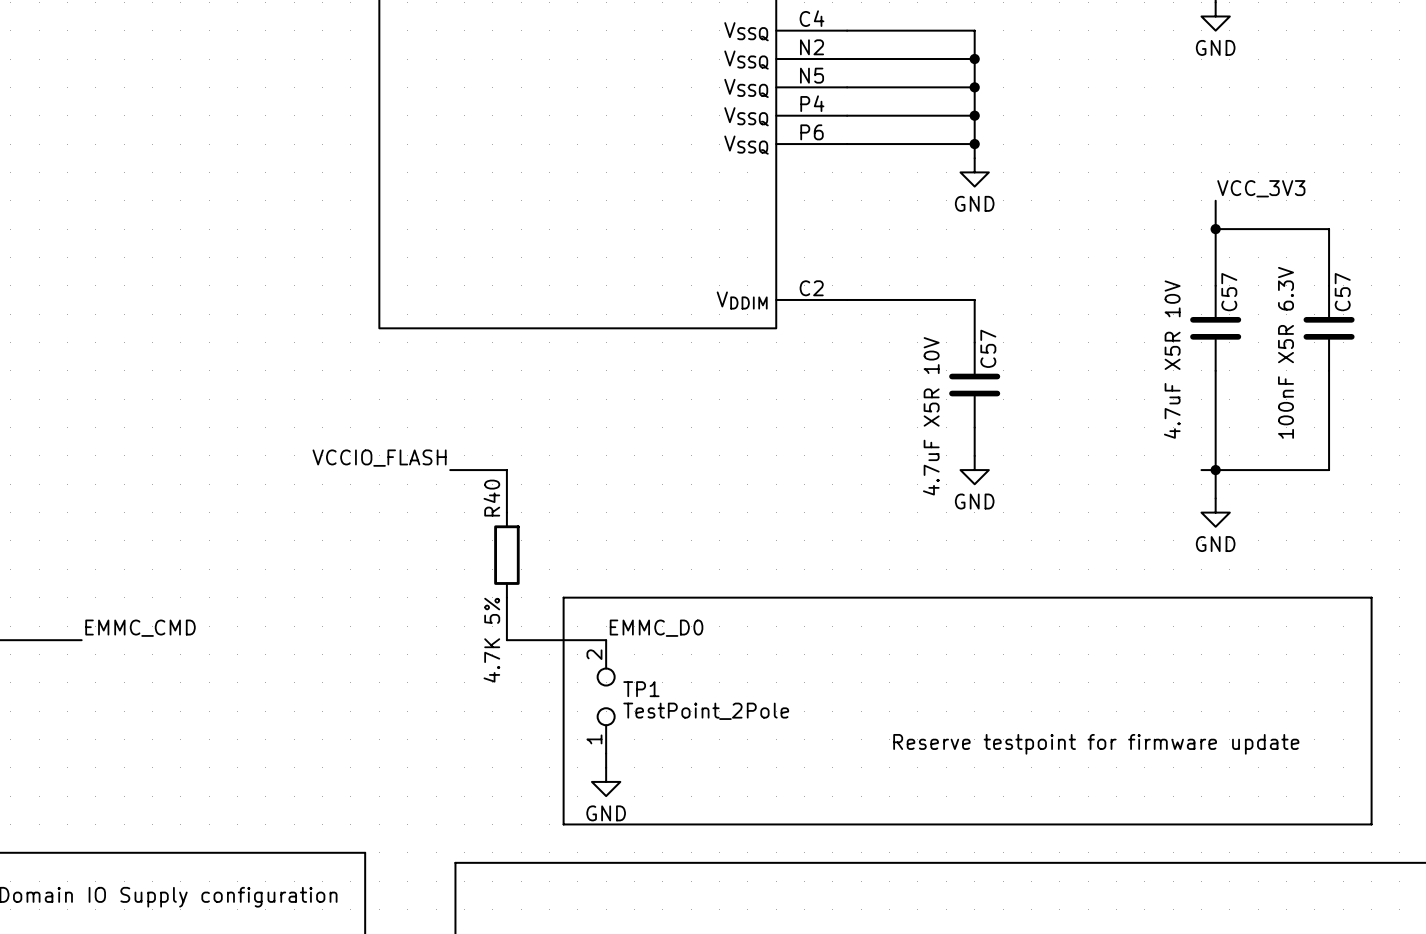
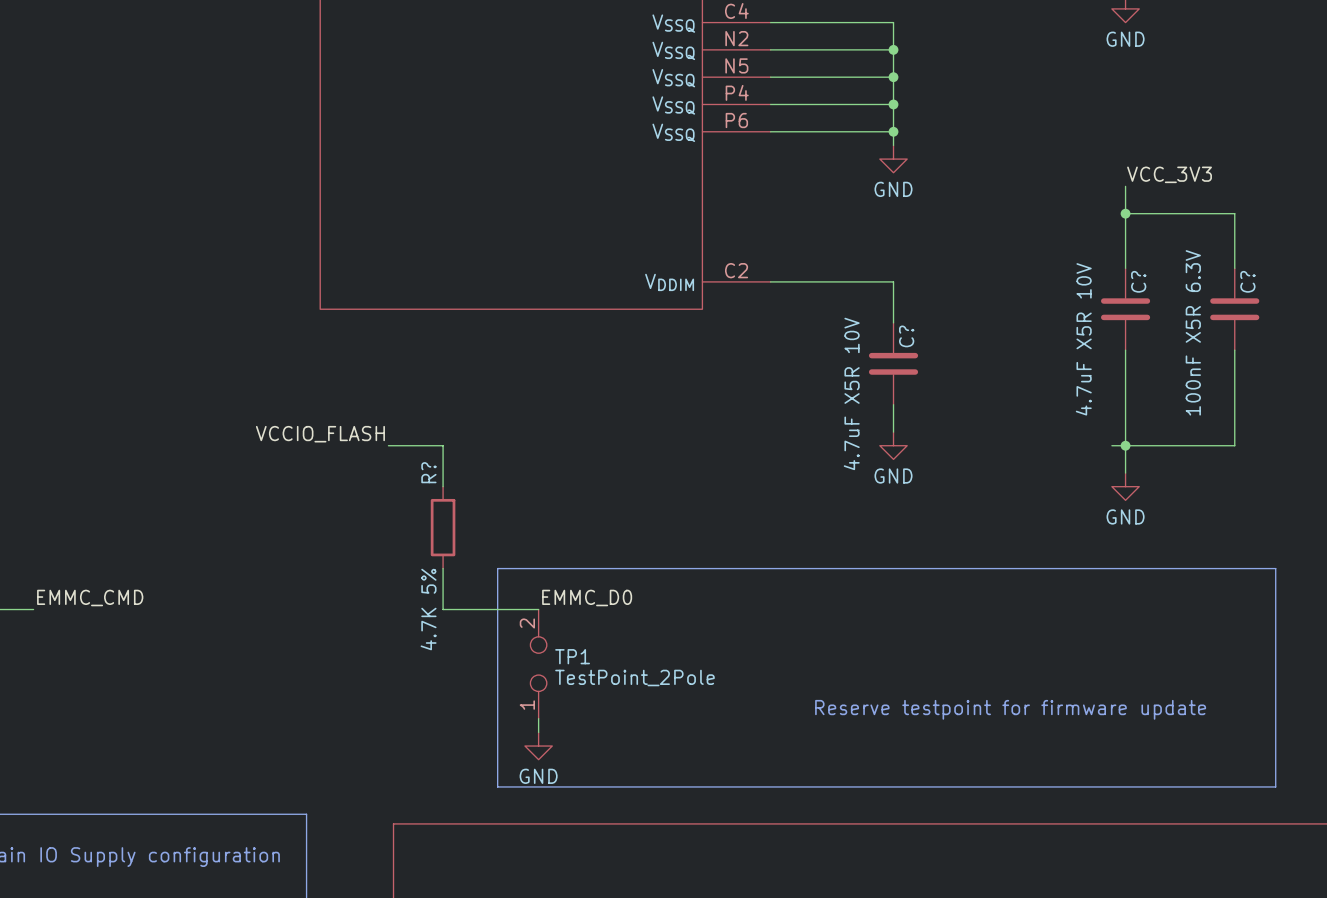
C57 name: C57 (1229, 292) -> C? (1138, 281)
C57 name: C57 (1342, 292) -> C? (1247, 281)
C57 name: C57 (988, 348) -> C? (906, 336)
R40 name: R40 (491, 498) -> R? (428, 472)

